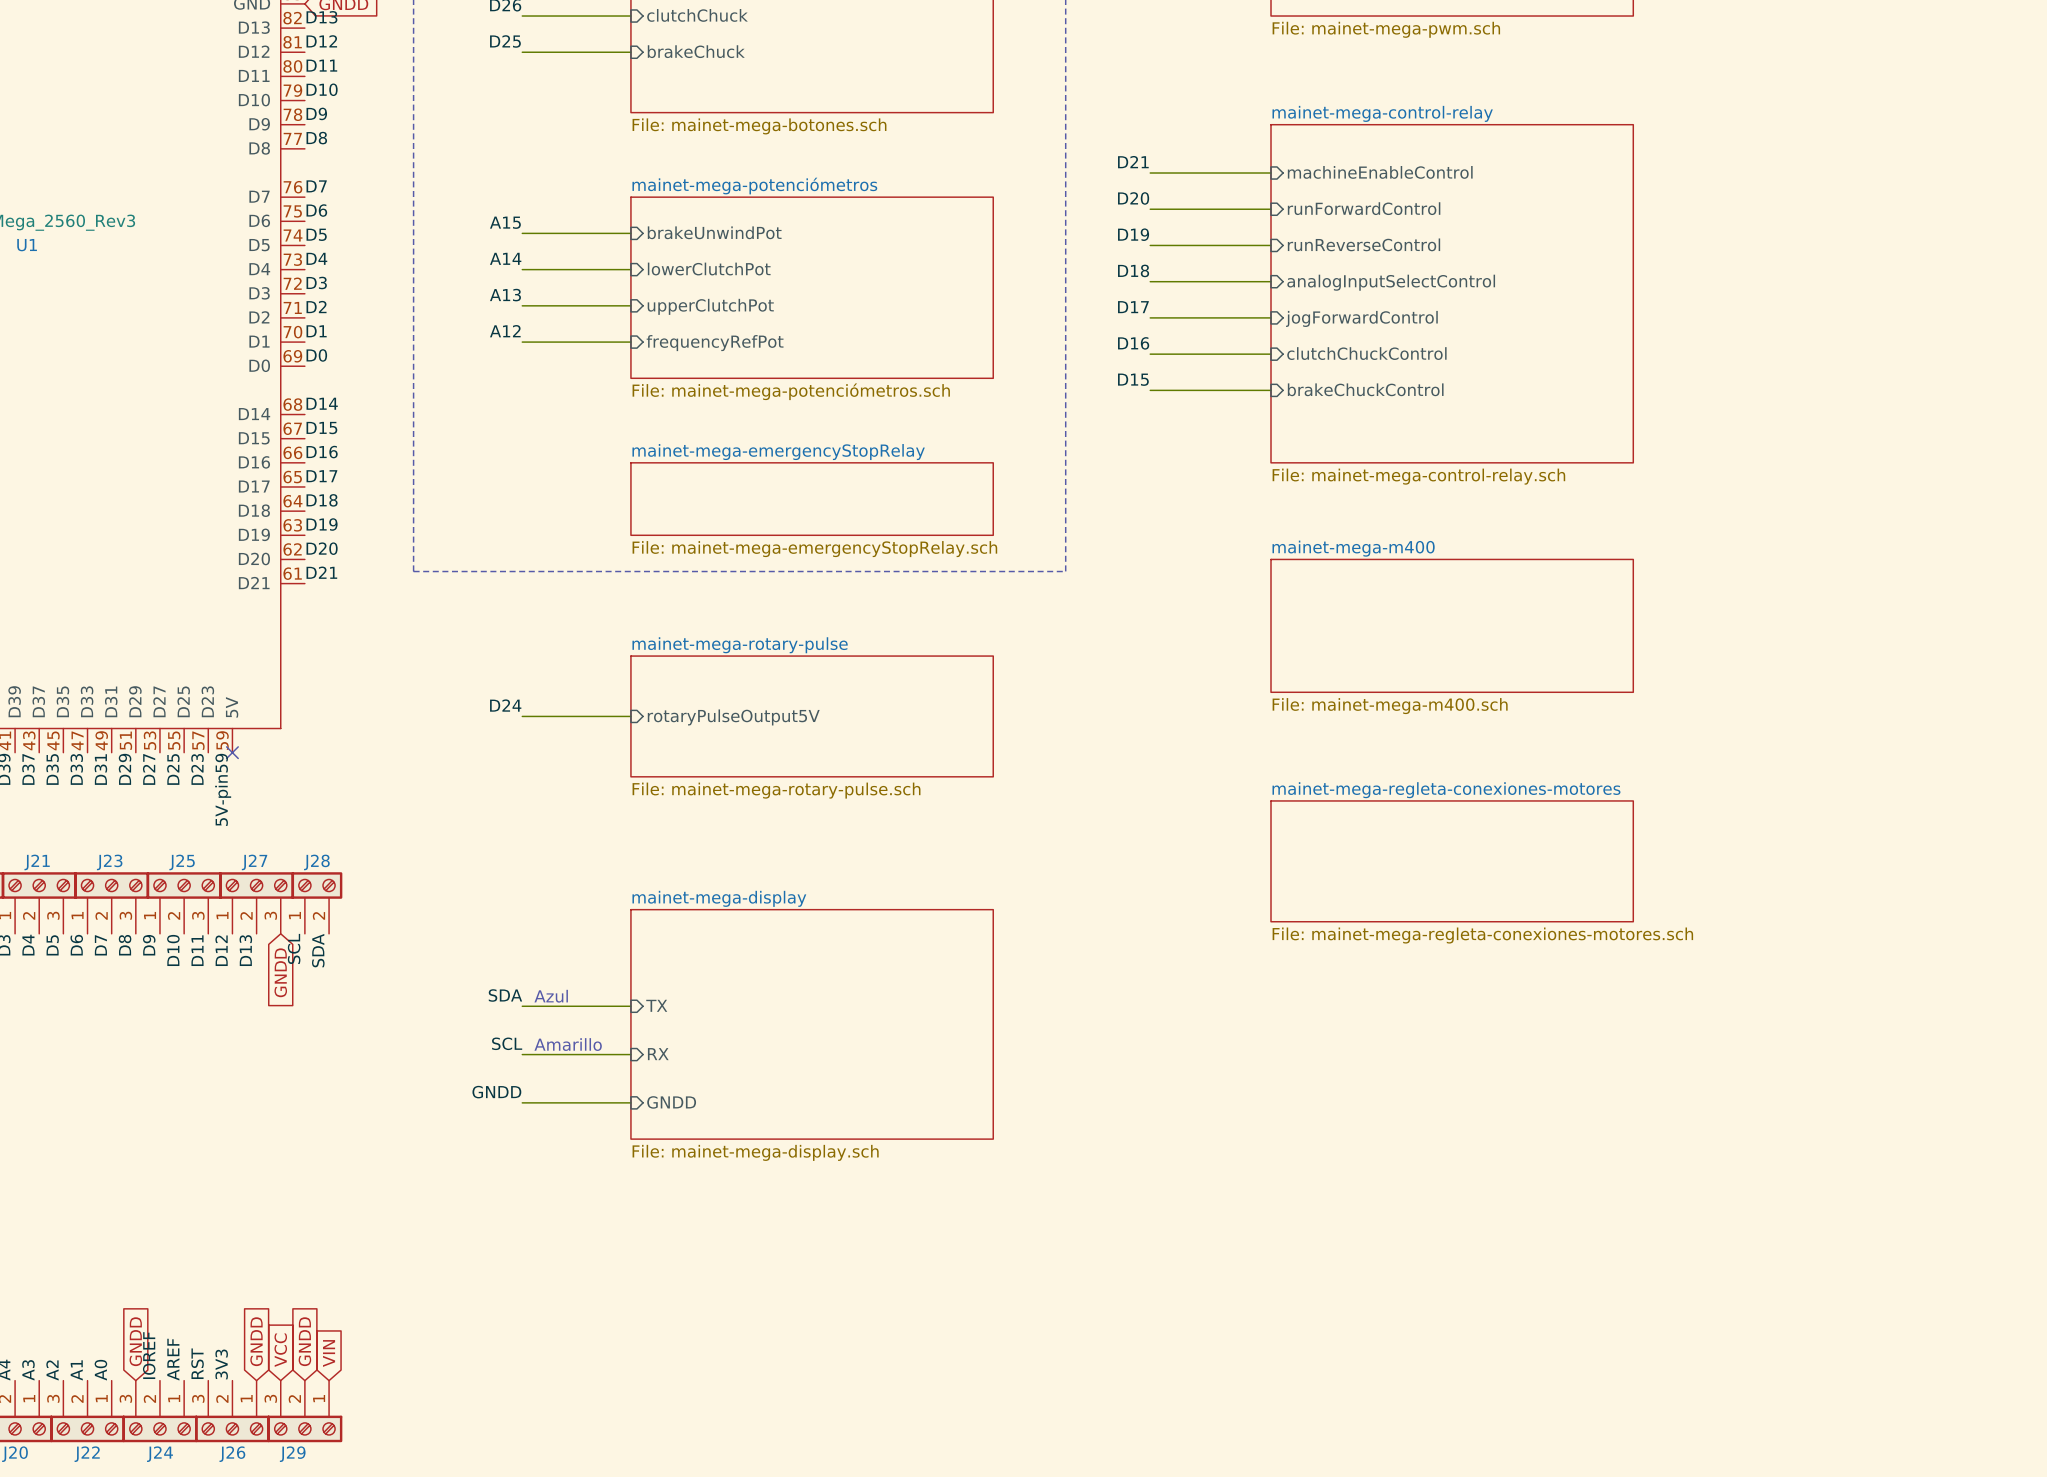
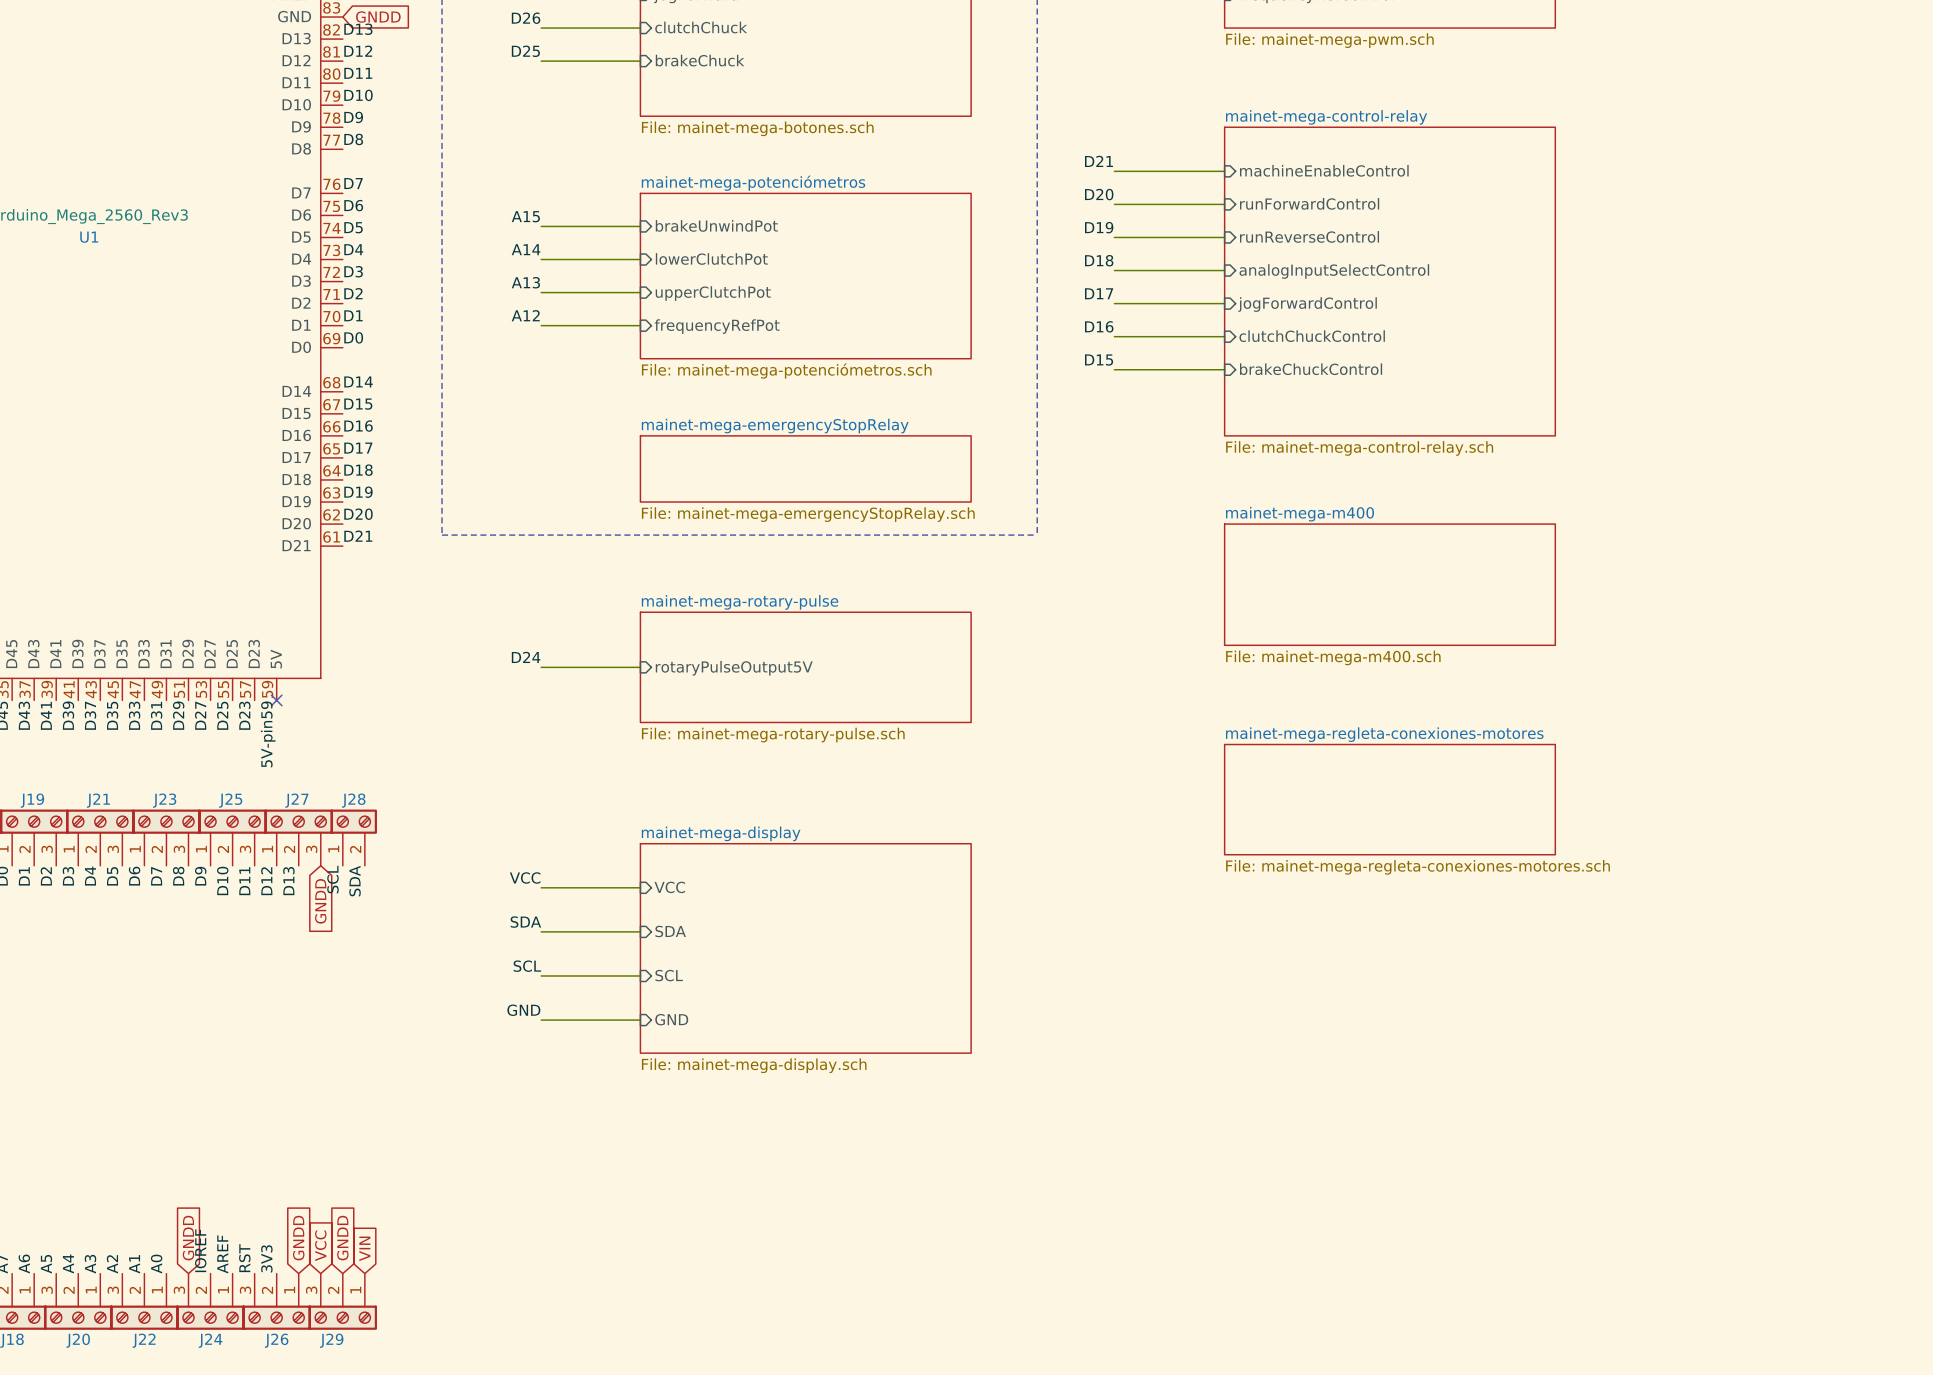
label: none -> VCC (525, 877)
wire: none -> (541, 887) (640, 887)
sheet pin: none -> VCC (669, 887)
text: Azul (551, 996) -> none
sheet pin: TX (656, 1005) -> SDA (670, 931)
text: Amarillo (568, 1044) -> none
sheet pin: RX (658, 1054) -> SCL (669, 975)
label: GNDD (496, 1092) -> GND (523, 1010)
sheet pin: GNDD (671, 1102) -> GND (671, 1019)

